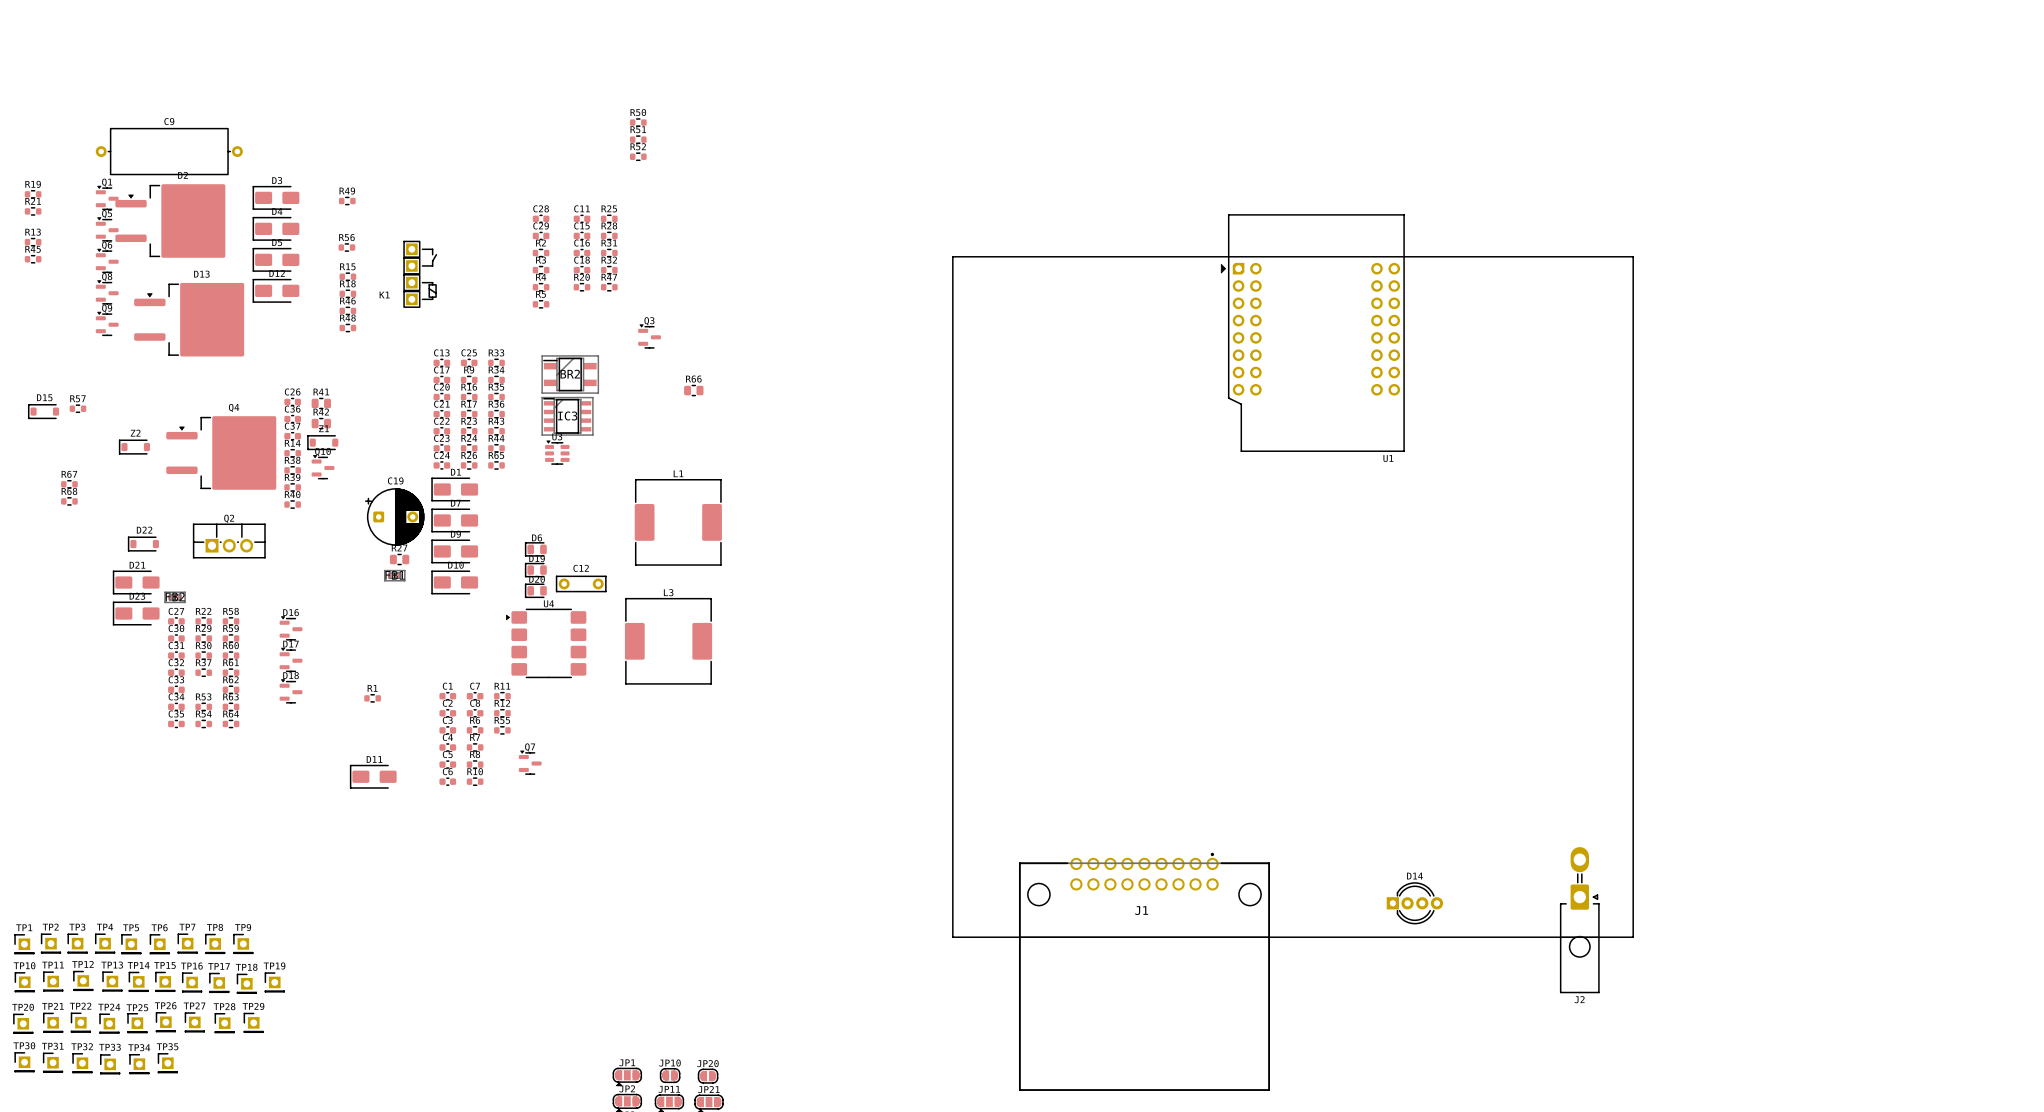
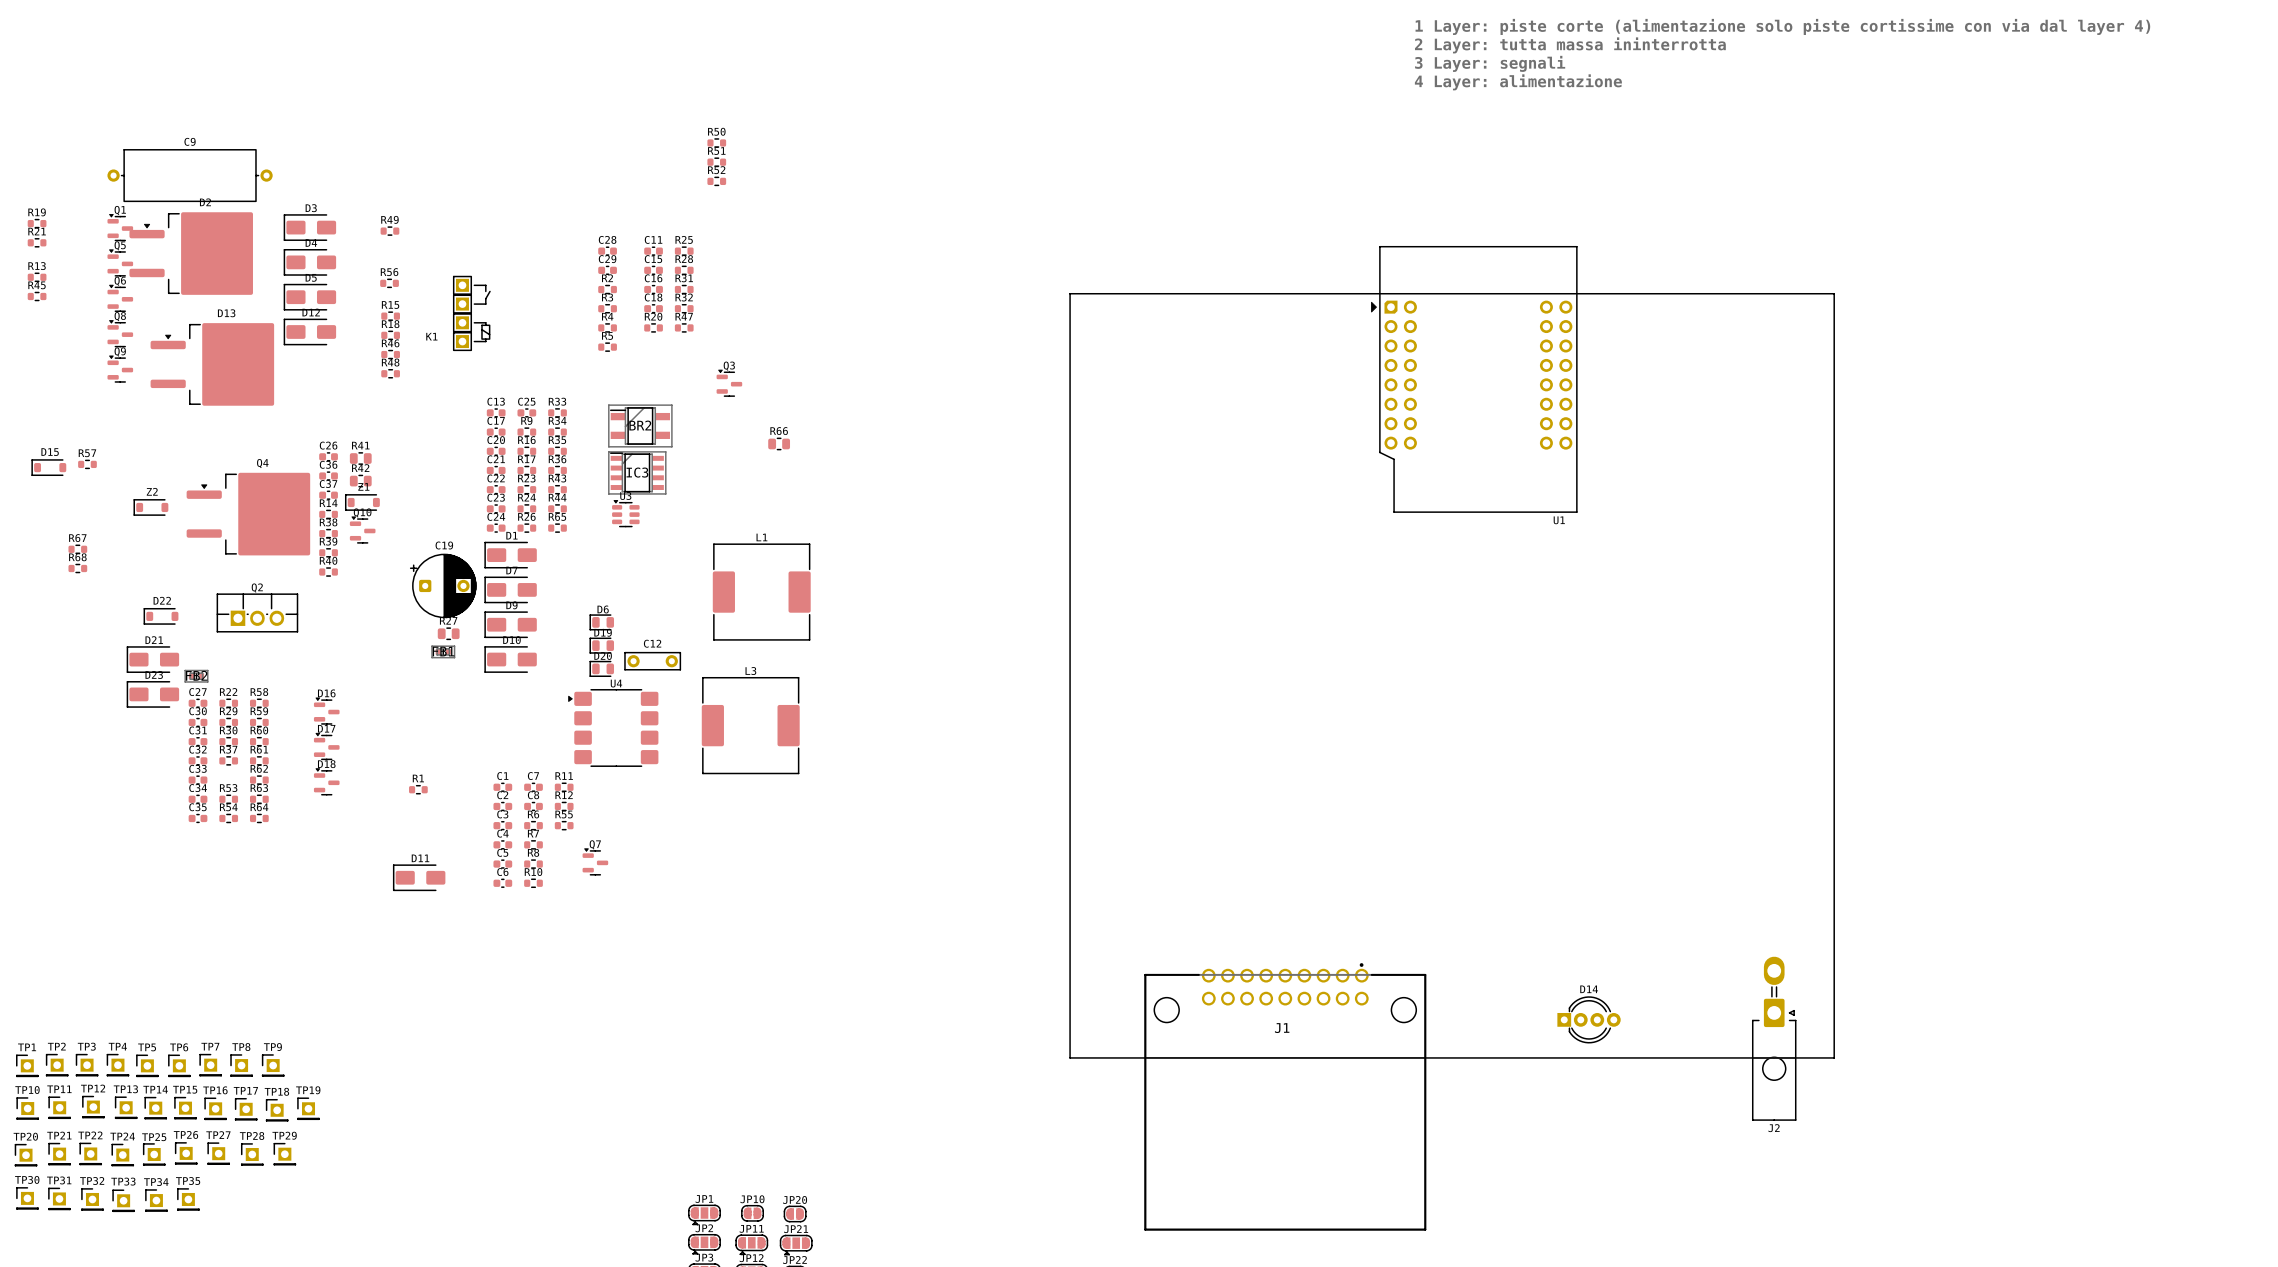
text: none -> 1 Layer: piste corte (alimentazione solo piste cortissime con via dal layer 4) (1782, 26)
text: none -> 2 Layer: tutta massa ininterrotta (1570, 45)
text: none -> 3 Layer: segnali (1490, 63)
text: none -> 4 Layer: alimentazione (1518, 82)

